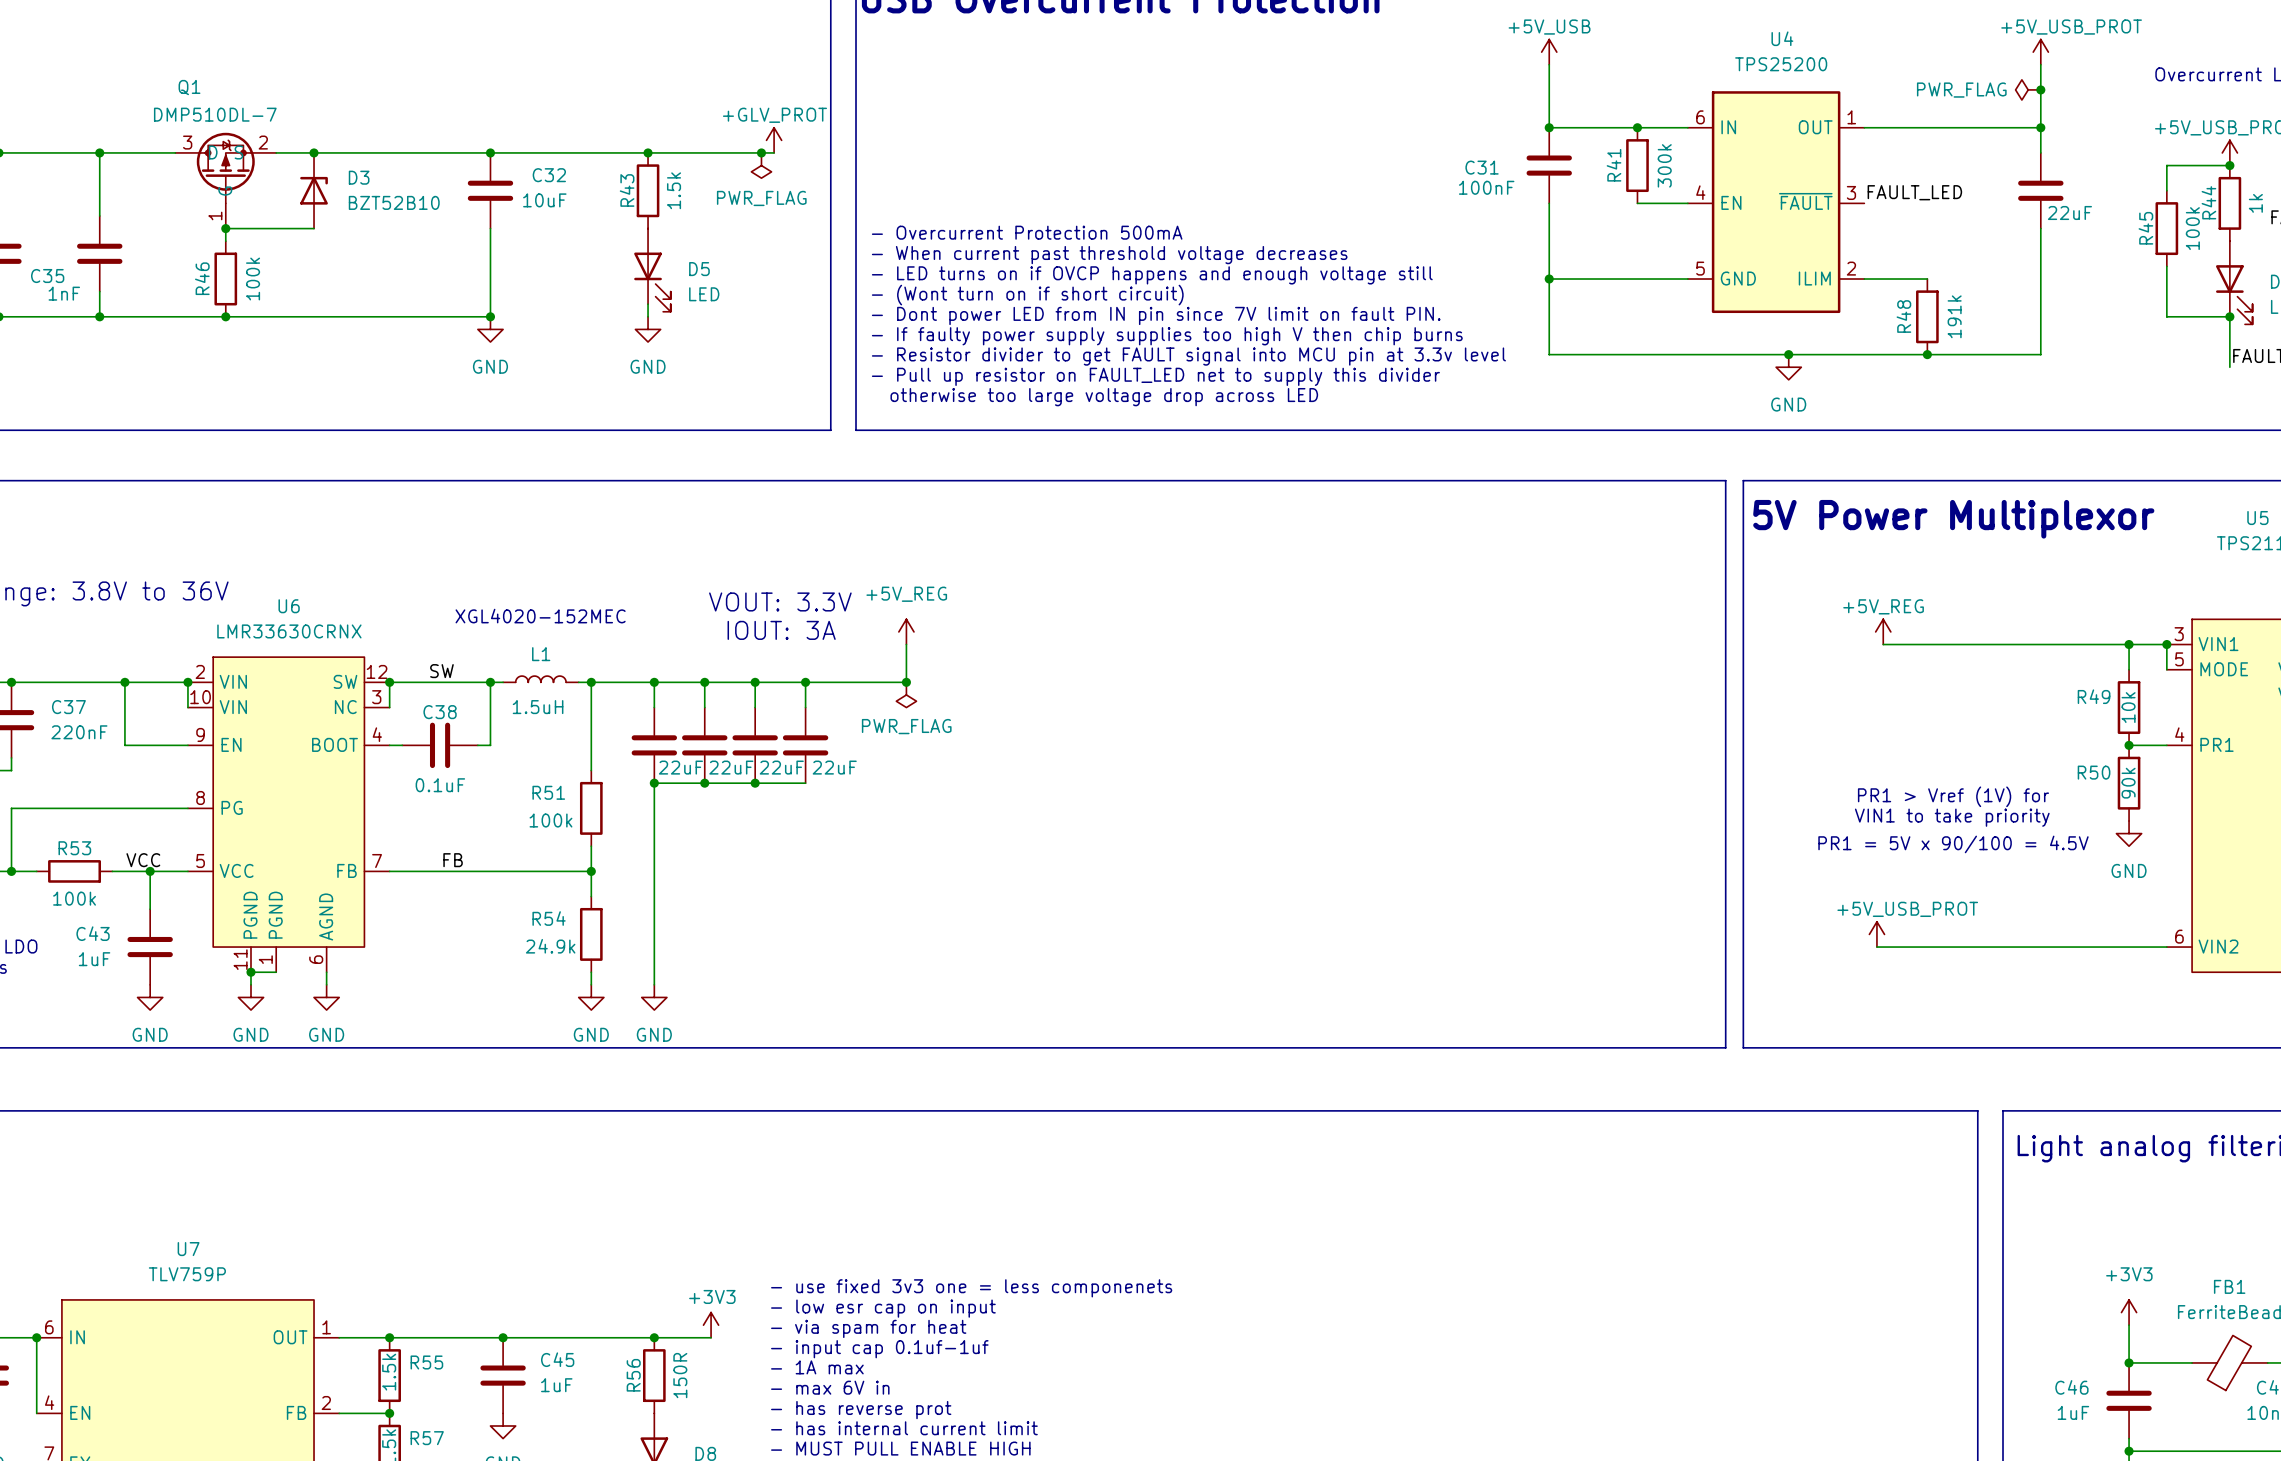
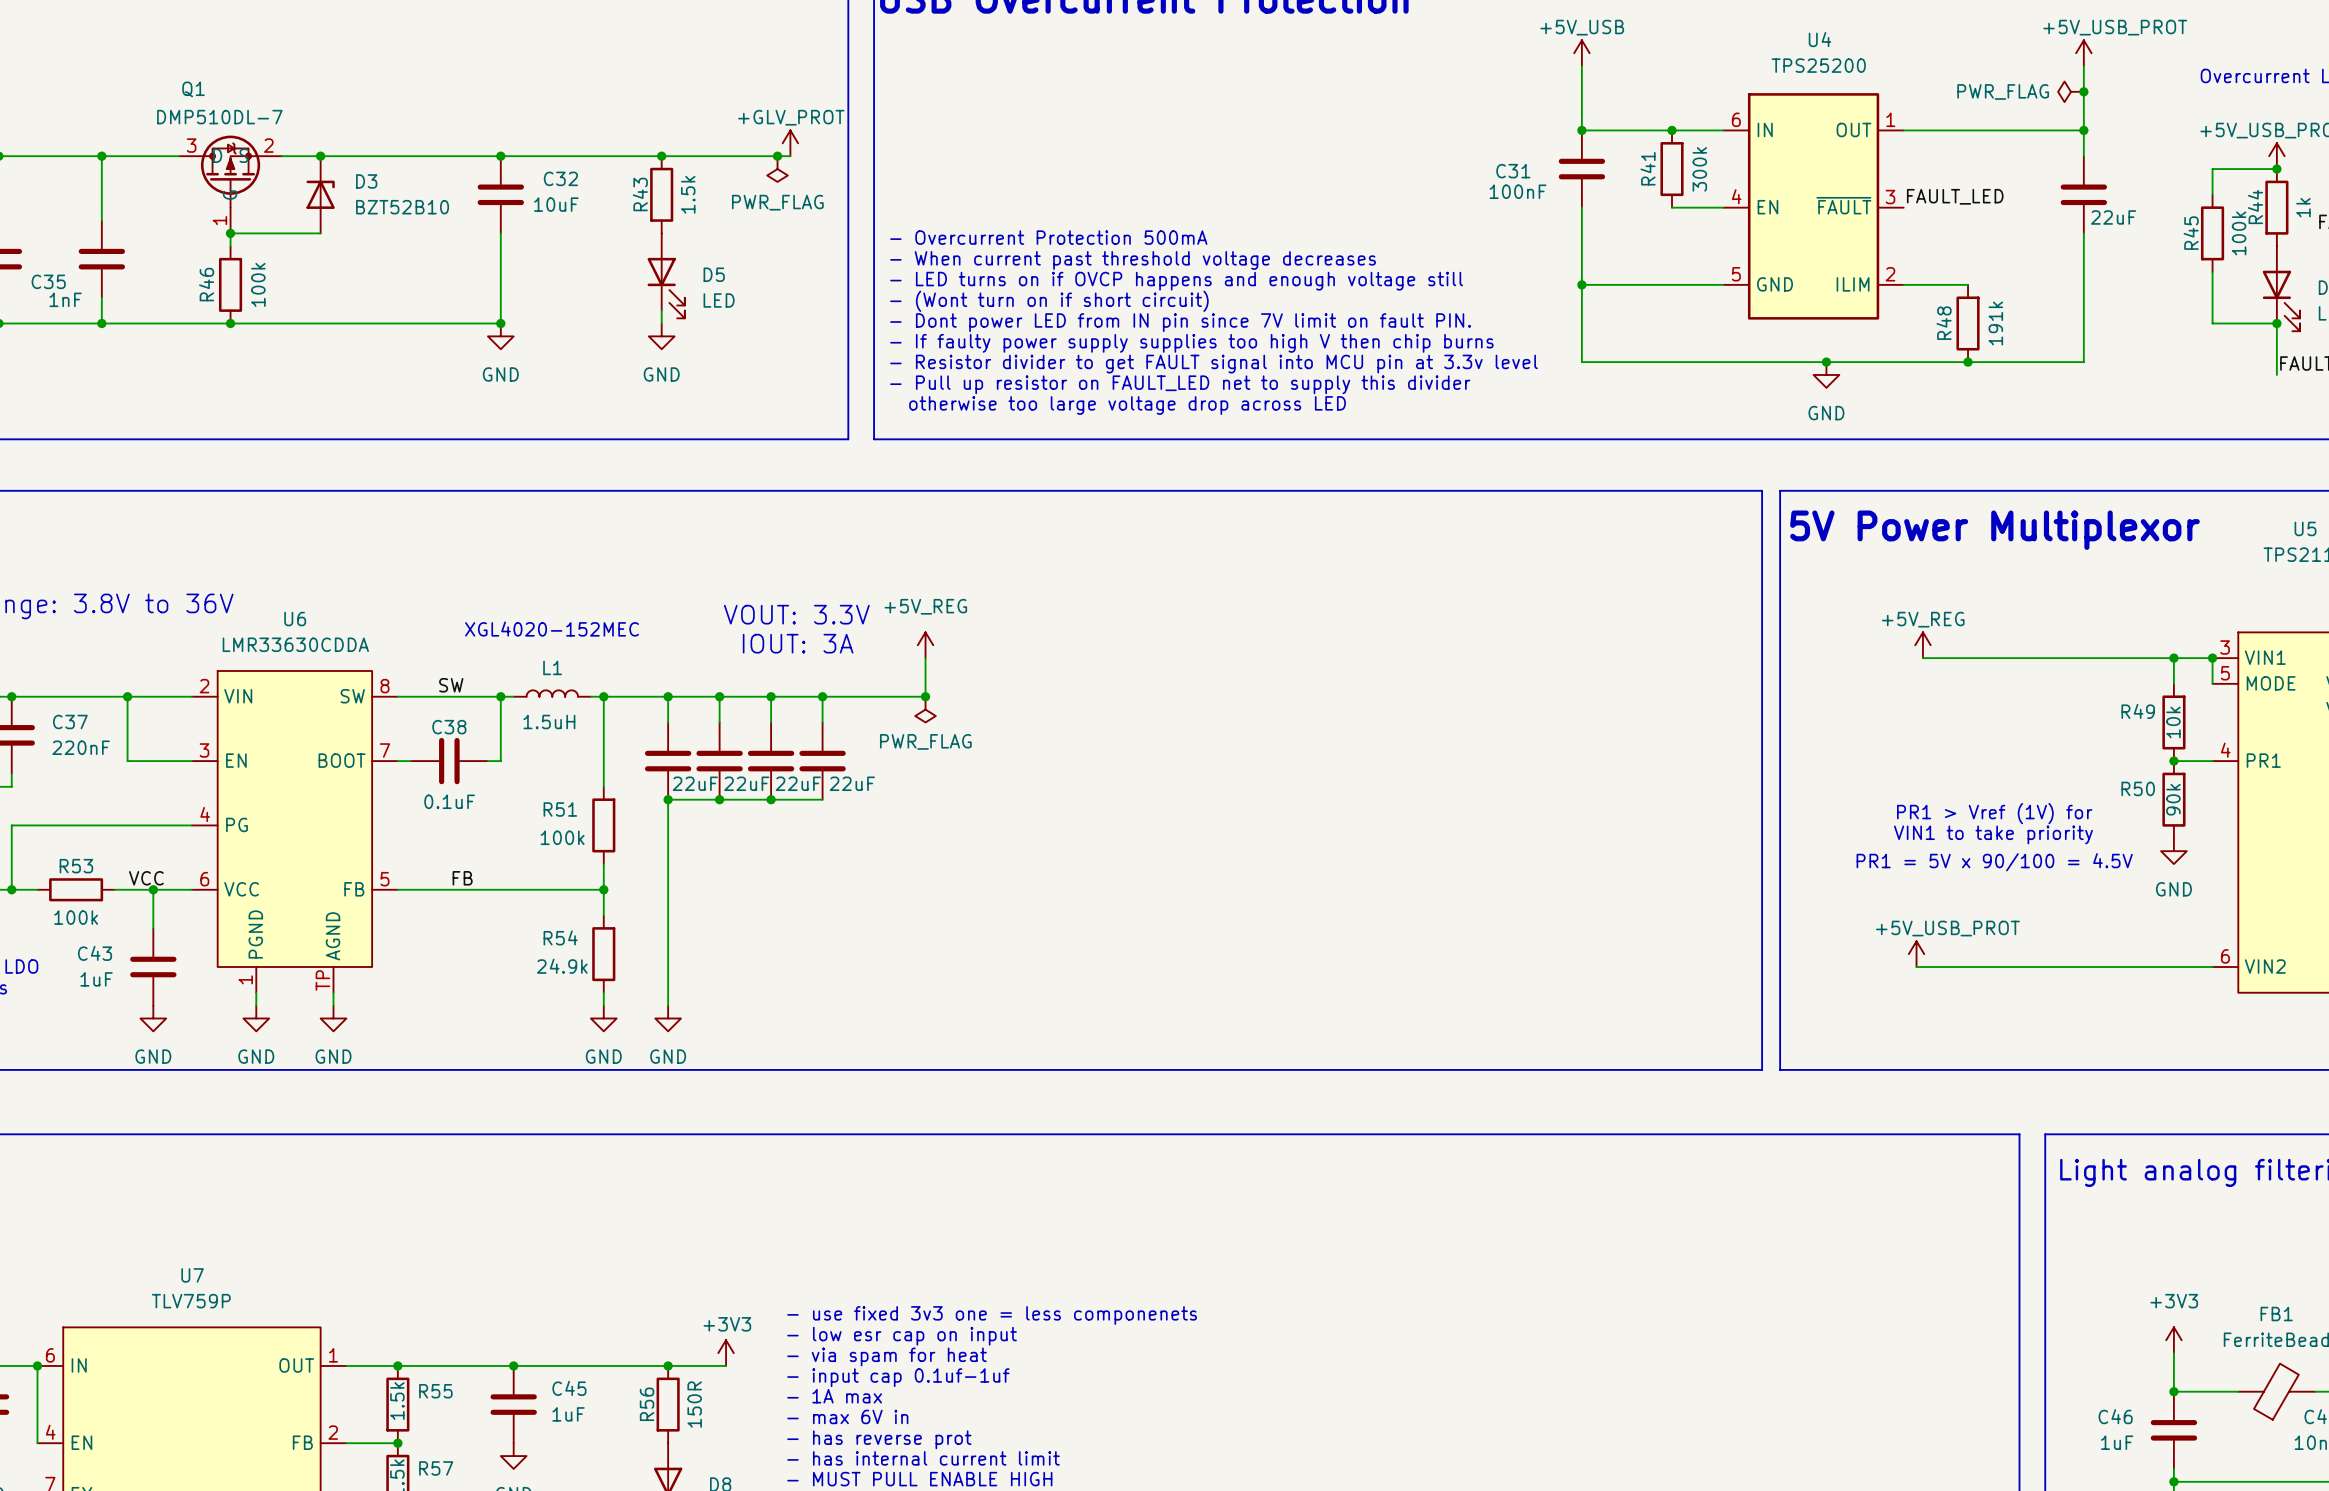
U6 value: LMR33630CRNX (289, 631) -> LMR33630CDDA (295, 644)
U6 symbol: [187, 657, 390, 973] -> [191, 670, 398, 993]
wire: (187, 682) (187, 707) -> none
junction: (187, 682) -> none
wire: (389, 682) (389, 707) -> none
junction: (389, 682) -> none
wire: (250, 972) (276, 972) -> none
junction: (250, 972) -> none

